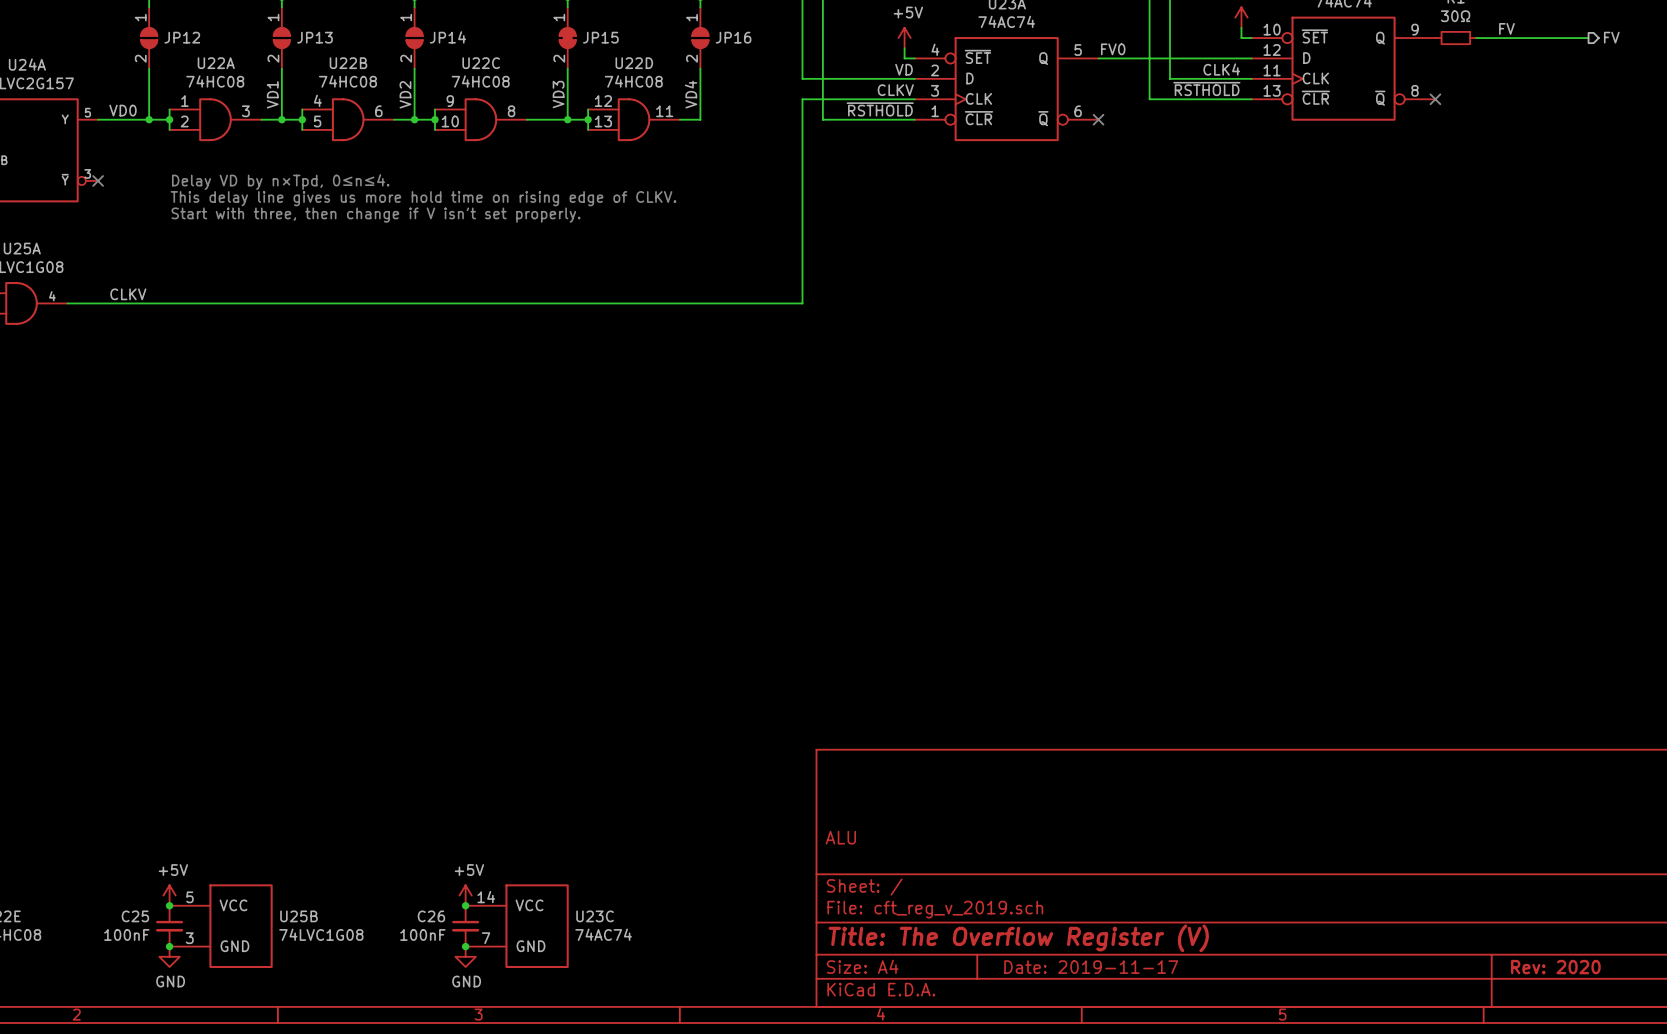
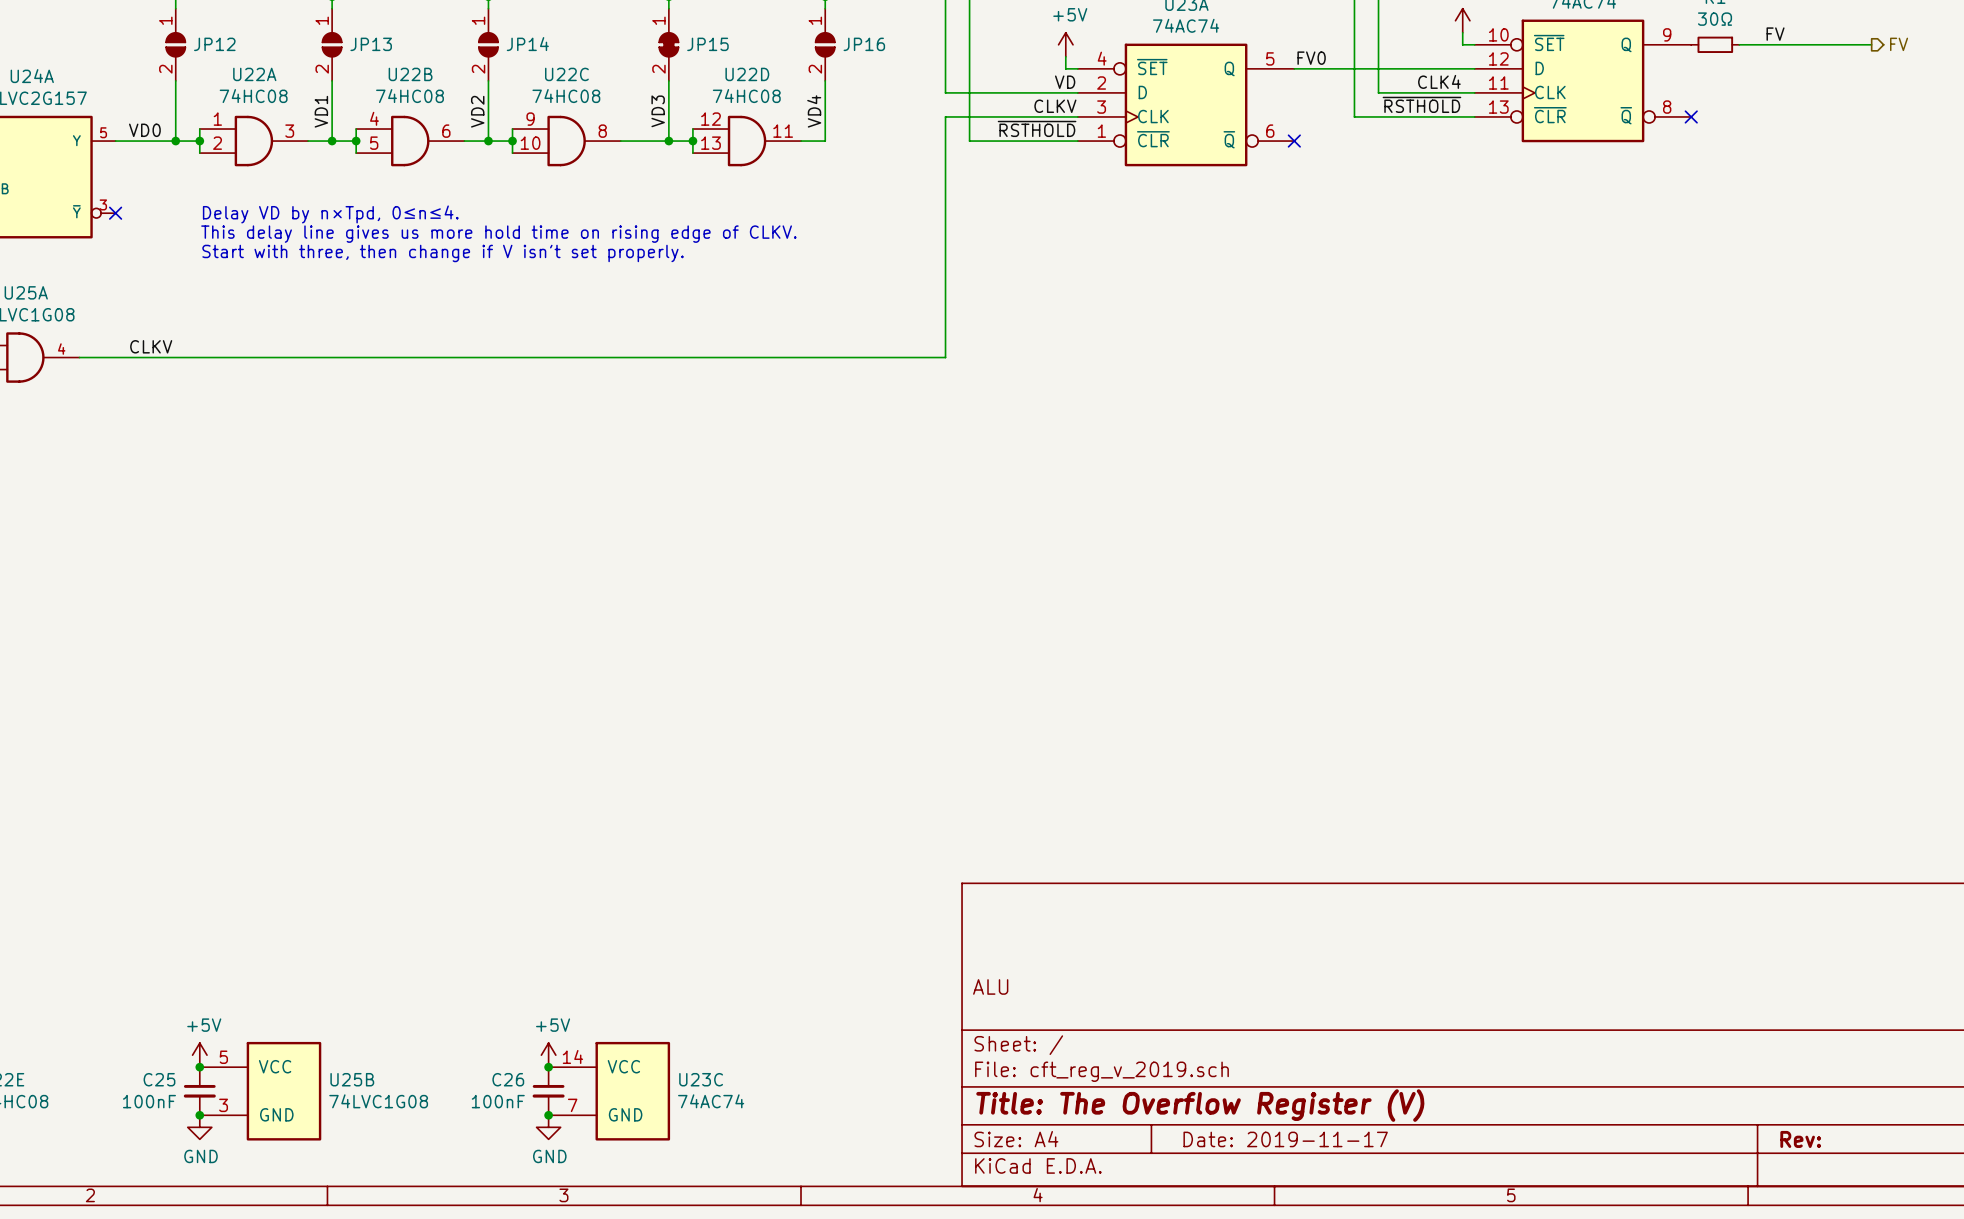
title block: Rev: 2020 (1555, 967) -> Rev: (1800, 1139)

